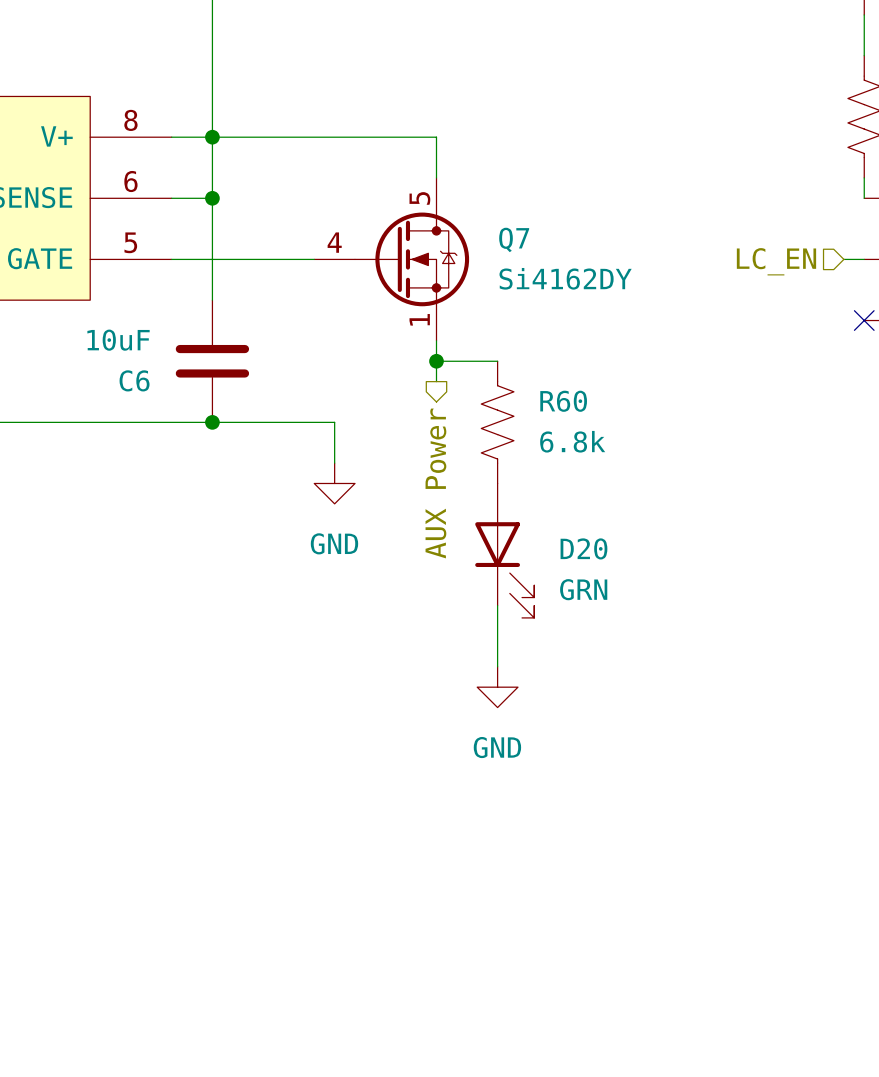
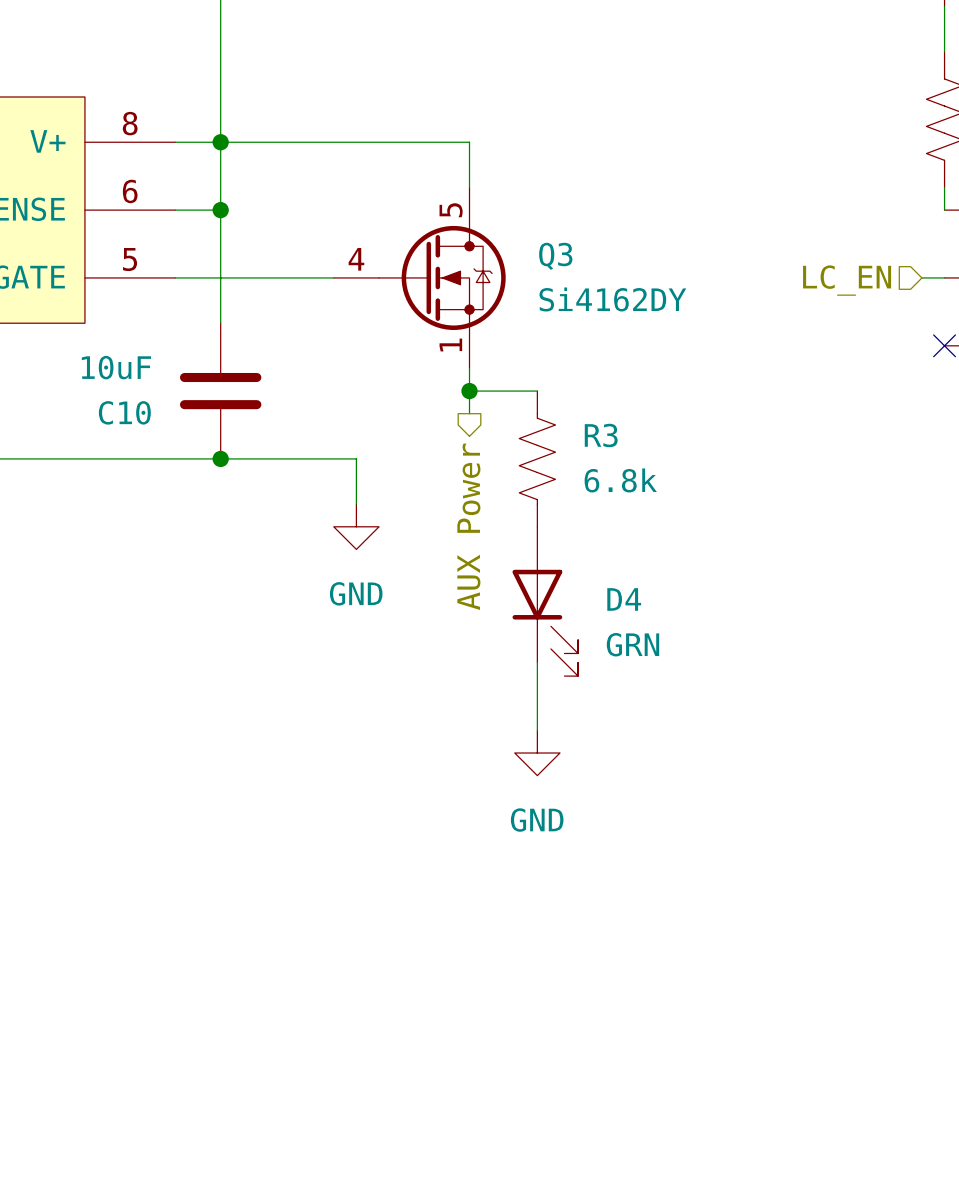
Q7 name: Q7 (514, 239) -> Q3 (555, 256)
C6 name: C6 (134, 380) -> C10 (124, 412)
R60 name: R60 (563, 401) -> R3 (601, 435)
D20 name: D20 (583, 548) -> D4 (624, 599)

